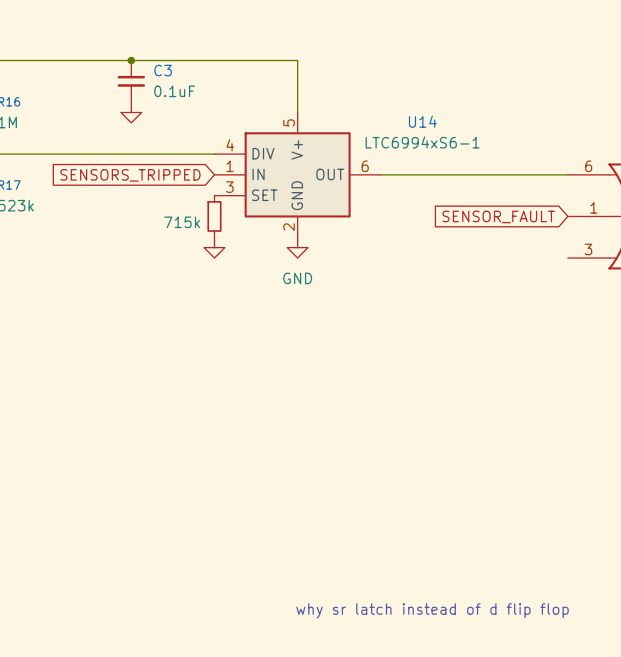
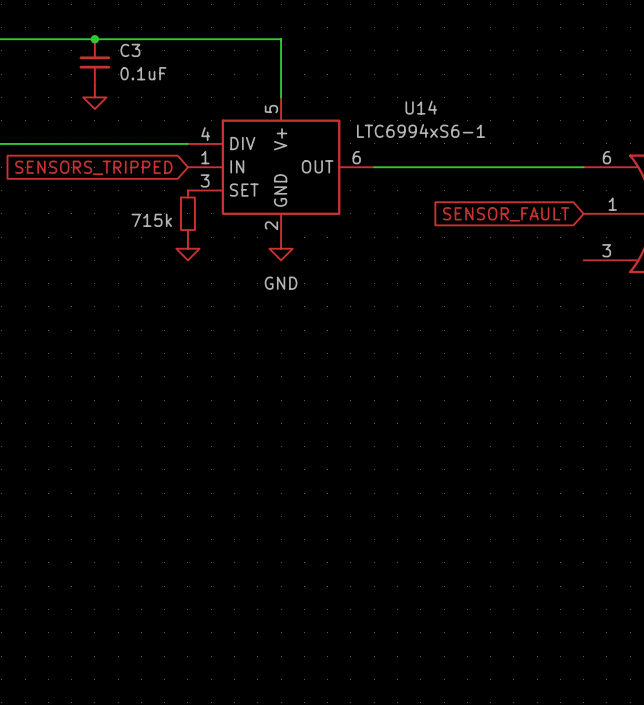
text: why sr latch instead of d flip flop (432, 610) -> none

